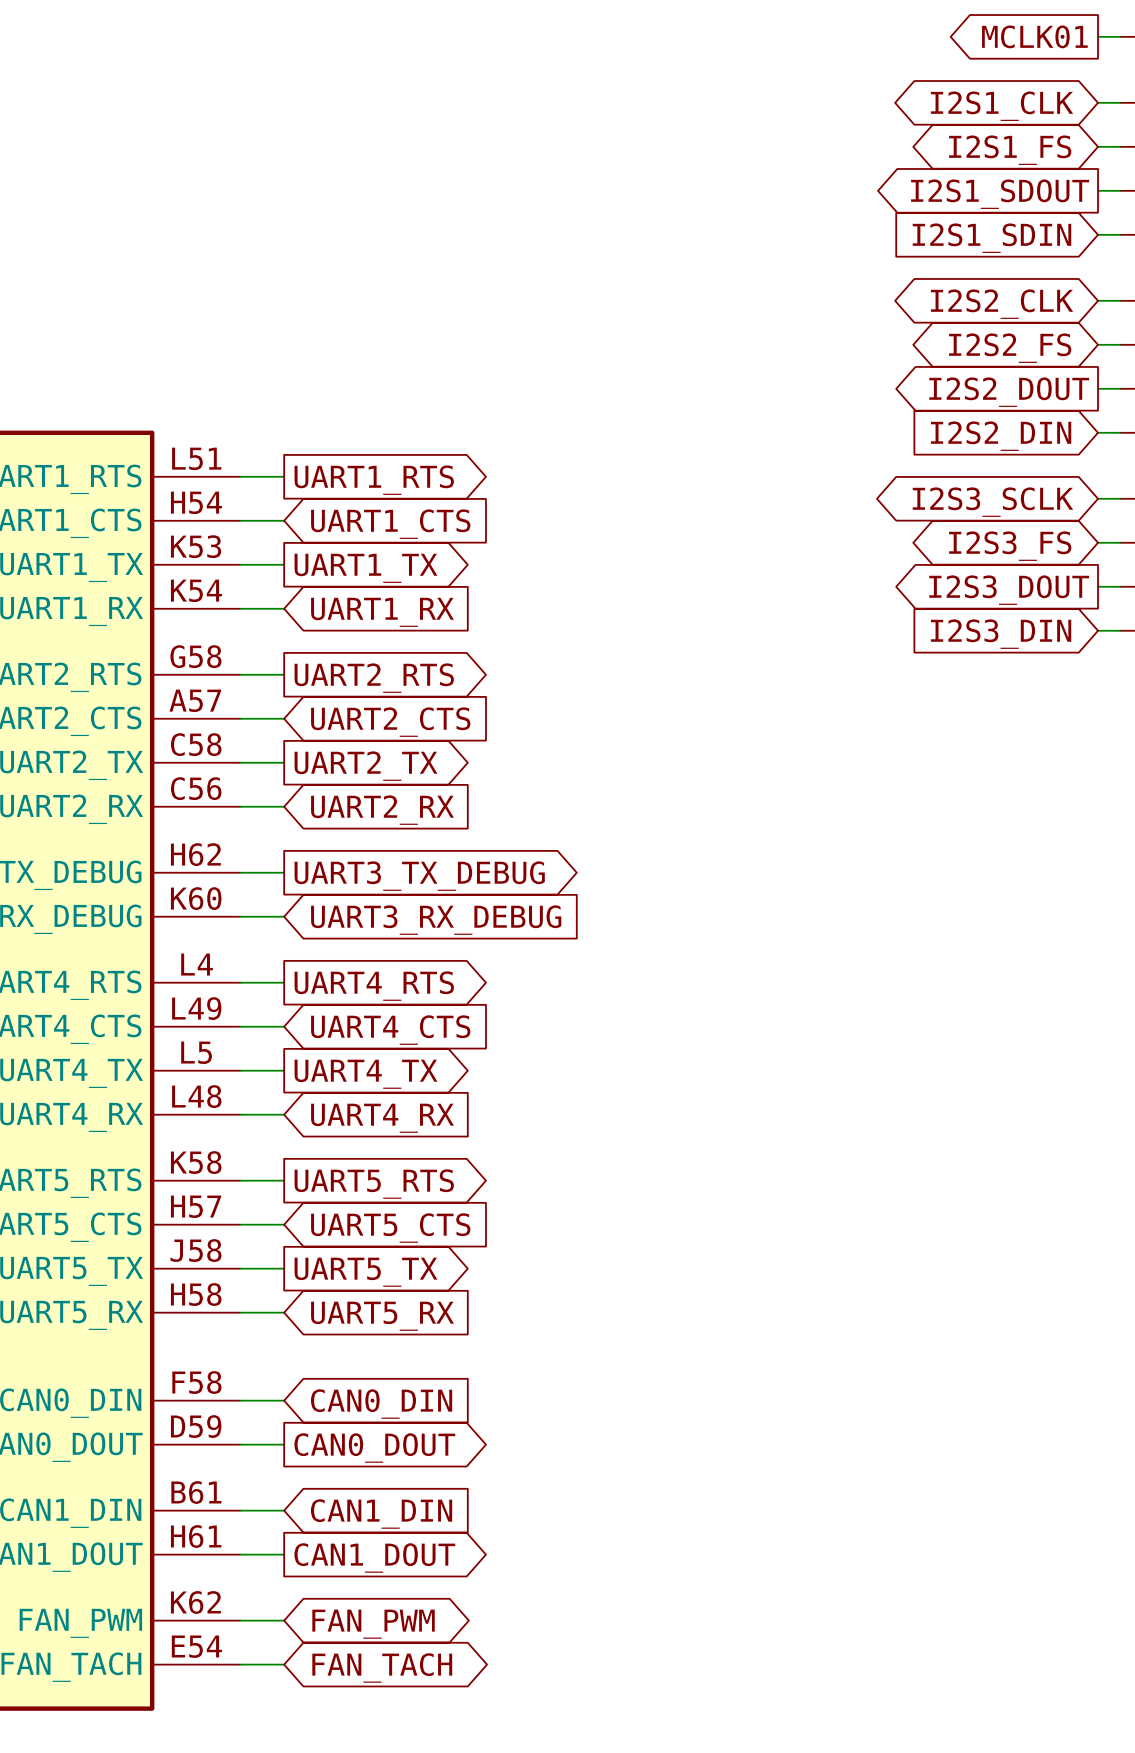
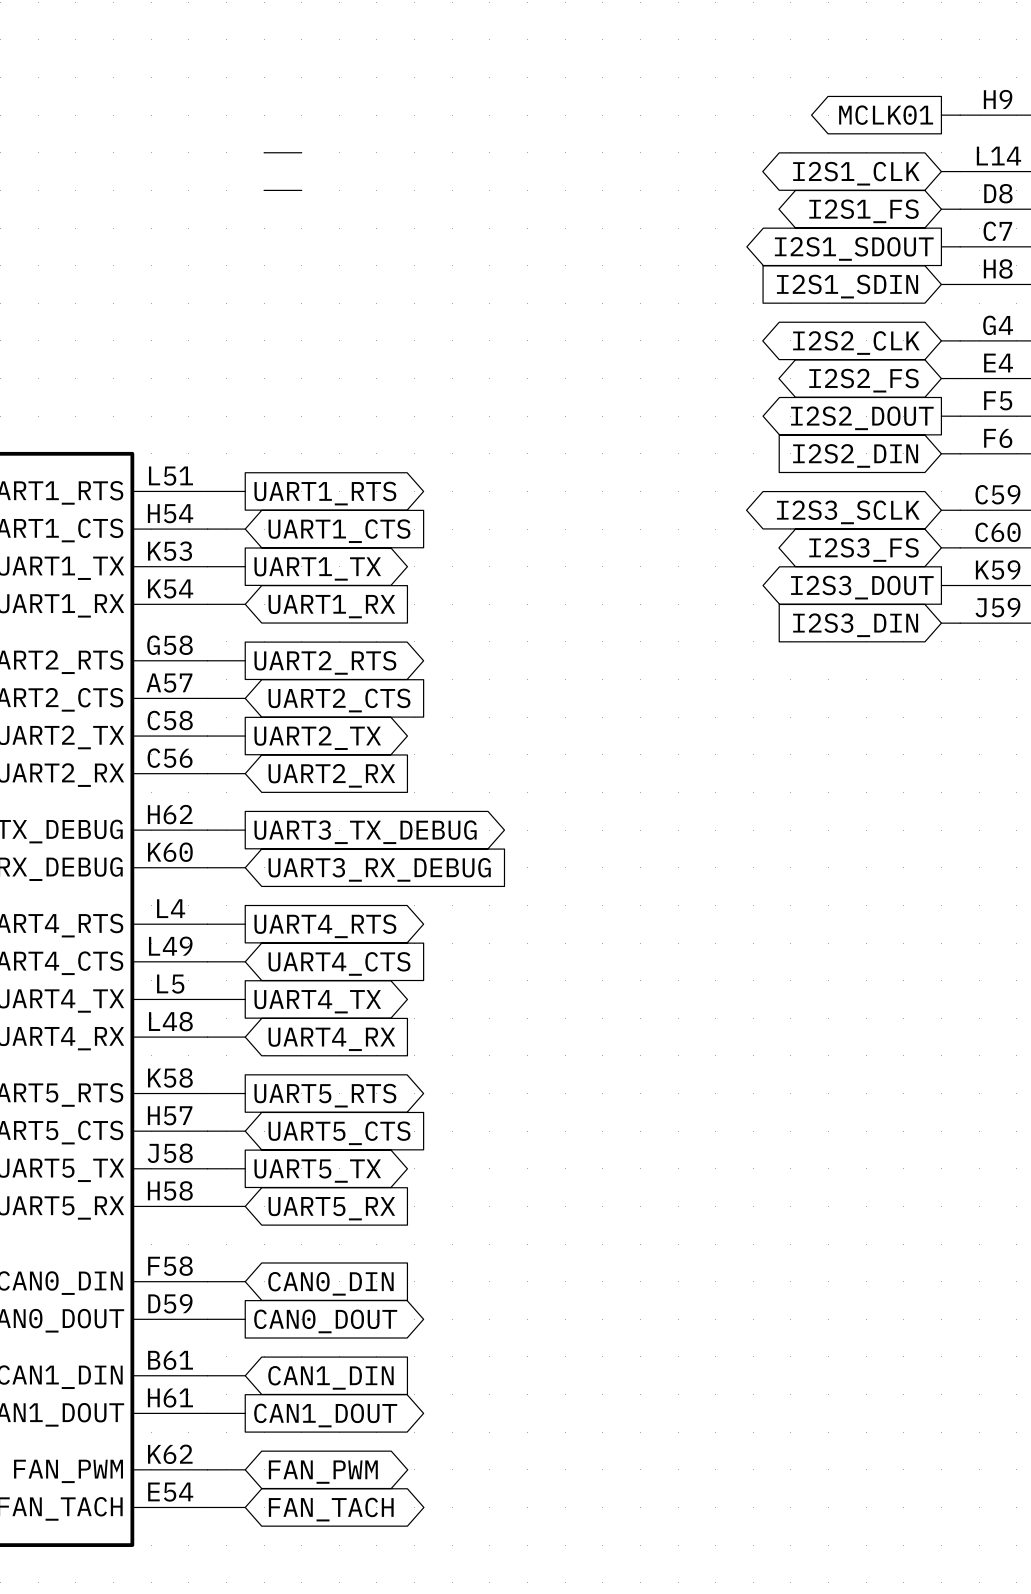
wire: none -> (264, 152) (301, 152)
wire: none -> (264, 190) (301, 190)

